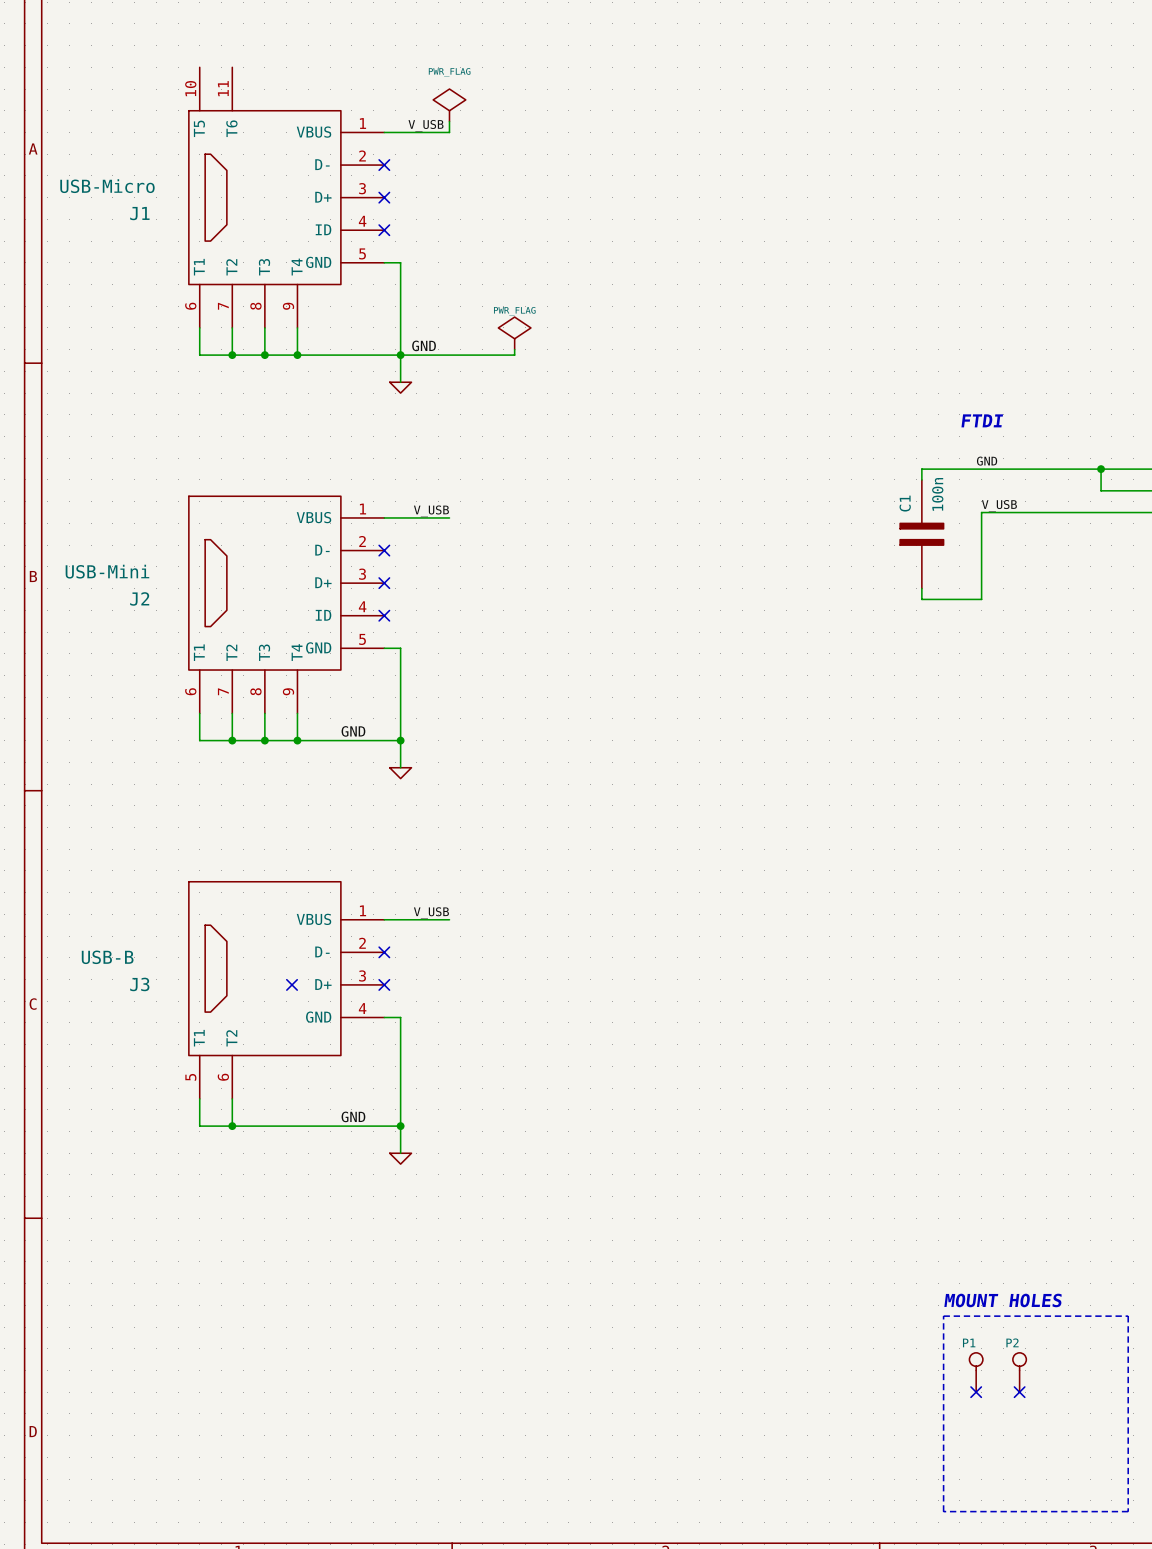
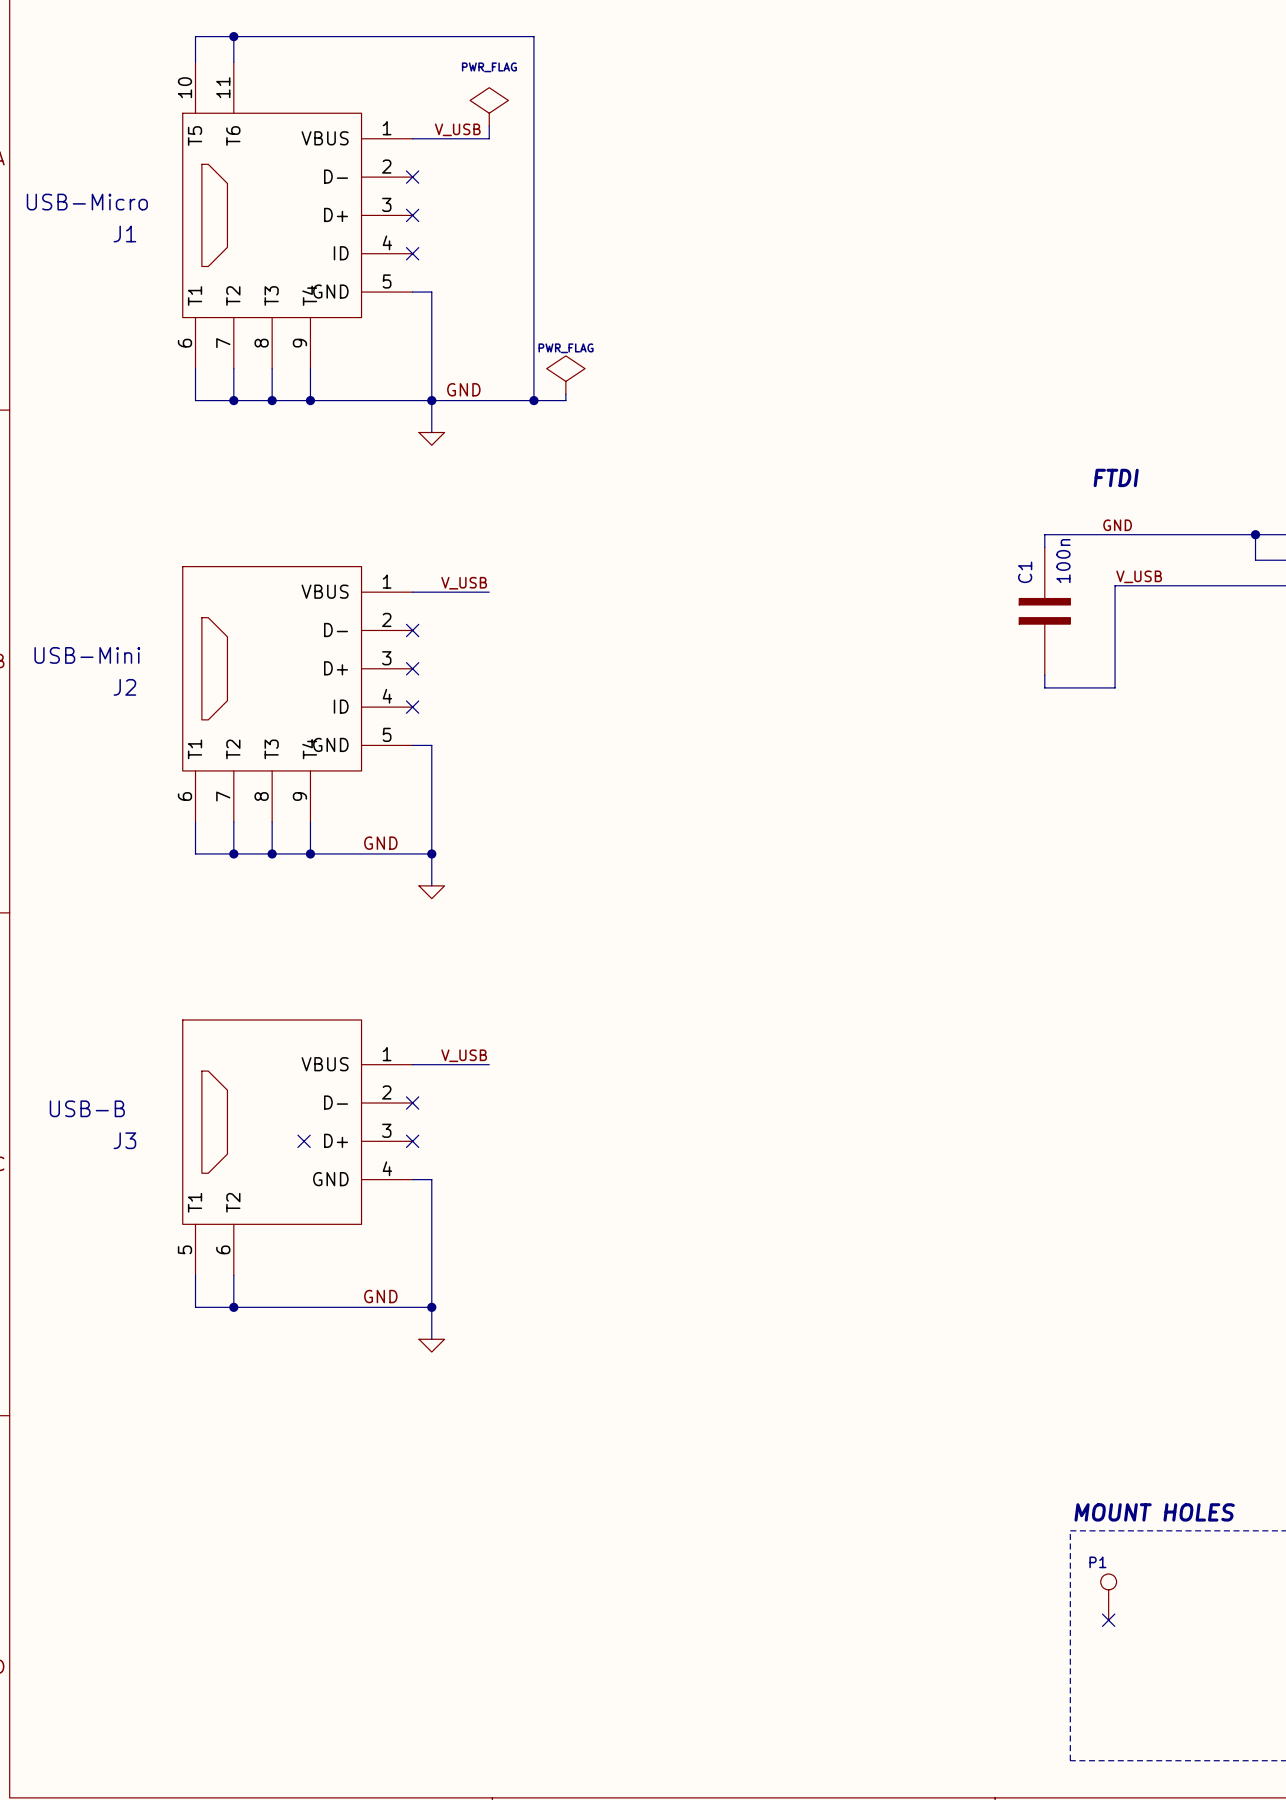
wire: none -> (233, 36) (233, 62)
junction: none -> (233, 36)
wire: none -> (195, 62) (195, 36) (533, 36) (533, 400)
junction: none -> (533, 400)
P2: (1019, 1372) -> none
no-connect mark: (1019, 1392) -> none

